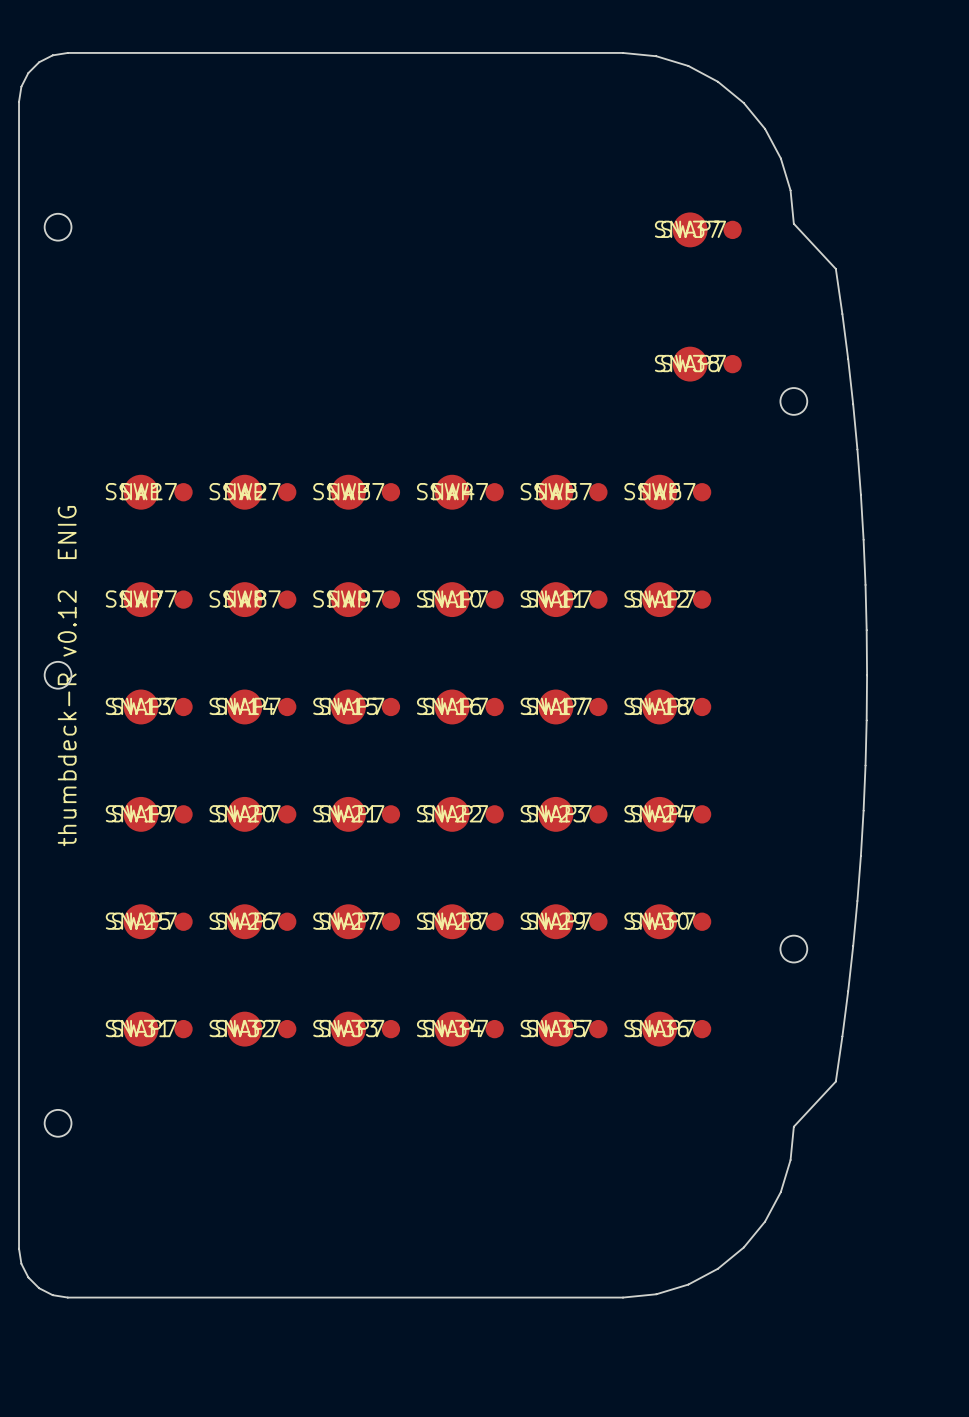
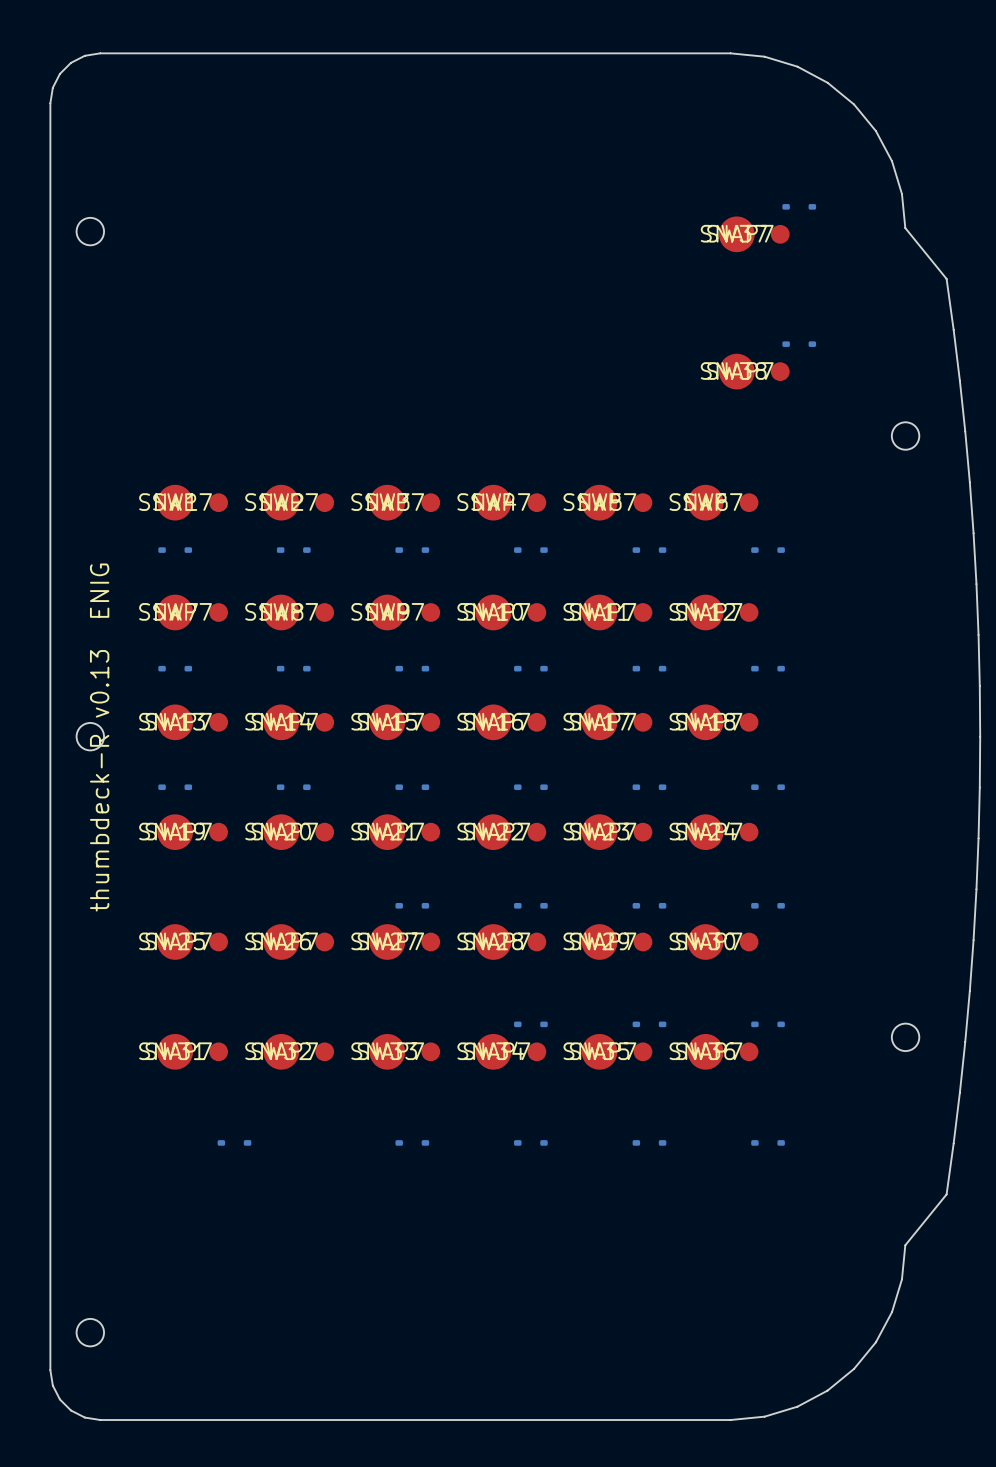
board edge: (623, 52) (656, 56) (688, 65) (717, 81) (743, 103) (765, 128) (780, 158) (790, 190) (793, 223) (835, 268) (842, 314) (857, 449) (865, 584) (866, 720) (860, 855) (848, 991) (835, 1081) (793, 1126) (790, 1160) (780, 1192) (765, 1221) (743, 1247) (717, 1268) (688, 1284) (656, 1294) (623, 1297) (67, 1297) (52, 1295) (39, 1288) (28, 1277) (21, 1263) (19, 1248) -> (668, 53) (730, 53) (764, 56) (797, 66) (827, 82) (854, 104) (875, 131) (892, 161) (901, 193) (905, 228) (946, 278) (965, 431) (976, 584) (980, 736) (976, 889) (965, 1041) (946, 1194) (905, 1245) (901, 1279) (892, 1312) (875, 1342) (854, 1368) (827, 1390) (797, 1406) (764, 1416) (730, 1420) (100, 1420) (84, 1417) (70, 1410) (59, 1399) (52, 1385) (50, 1370) (50, 1276)
part: none -> (799, 206)
part: none -> (799, 344)
round board edge position: (793, 401) -> (905, 436)
part: none -> (175, 550)
part: none -> (293, 550)
part: none -> (412, 550)
part: none -> (530, 550)
part: none -> (649, 550)
part: none -> (768, 550)
part: none -> (175, 668)
part: none -> (293, 668)
part: none -> (412, 668)
part: none -> (530, 668)
part: none -> (649, 668)
part: none -> (768, 668)
round board edge position: (58, 675) -> (90, 736)
text: thumbdeck-R v0.12 ENIG (67, 676) -> thumbdeck-R v0.13 ENIG (99, 737)
part: none -> (175, 787)
part: none -> (293, 787)
part: none -> (412, 787)
part: none -> (530, 787)
part: none -> (649, 787)
part: none -> (768, 787)
part: none -> (412, 905)
part: none -> (530, 905)
part: none -> (649, 905)
part: none -> (768, 905)
round board edge position: (793, 949) -> (905, 1037)
part: none -> (530, 1024)
part: none -> (649, 1024)
part: none -> (768, 1024)
part: none -> (234, 1142)
part: none -> (412, 1142)
part: none -> (530, 1142)
part: none -> (649, 1142)
part: none -> (768, 1142)
round board edge position: (58, 1123) -> (90, 1332)

